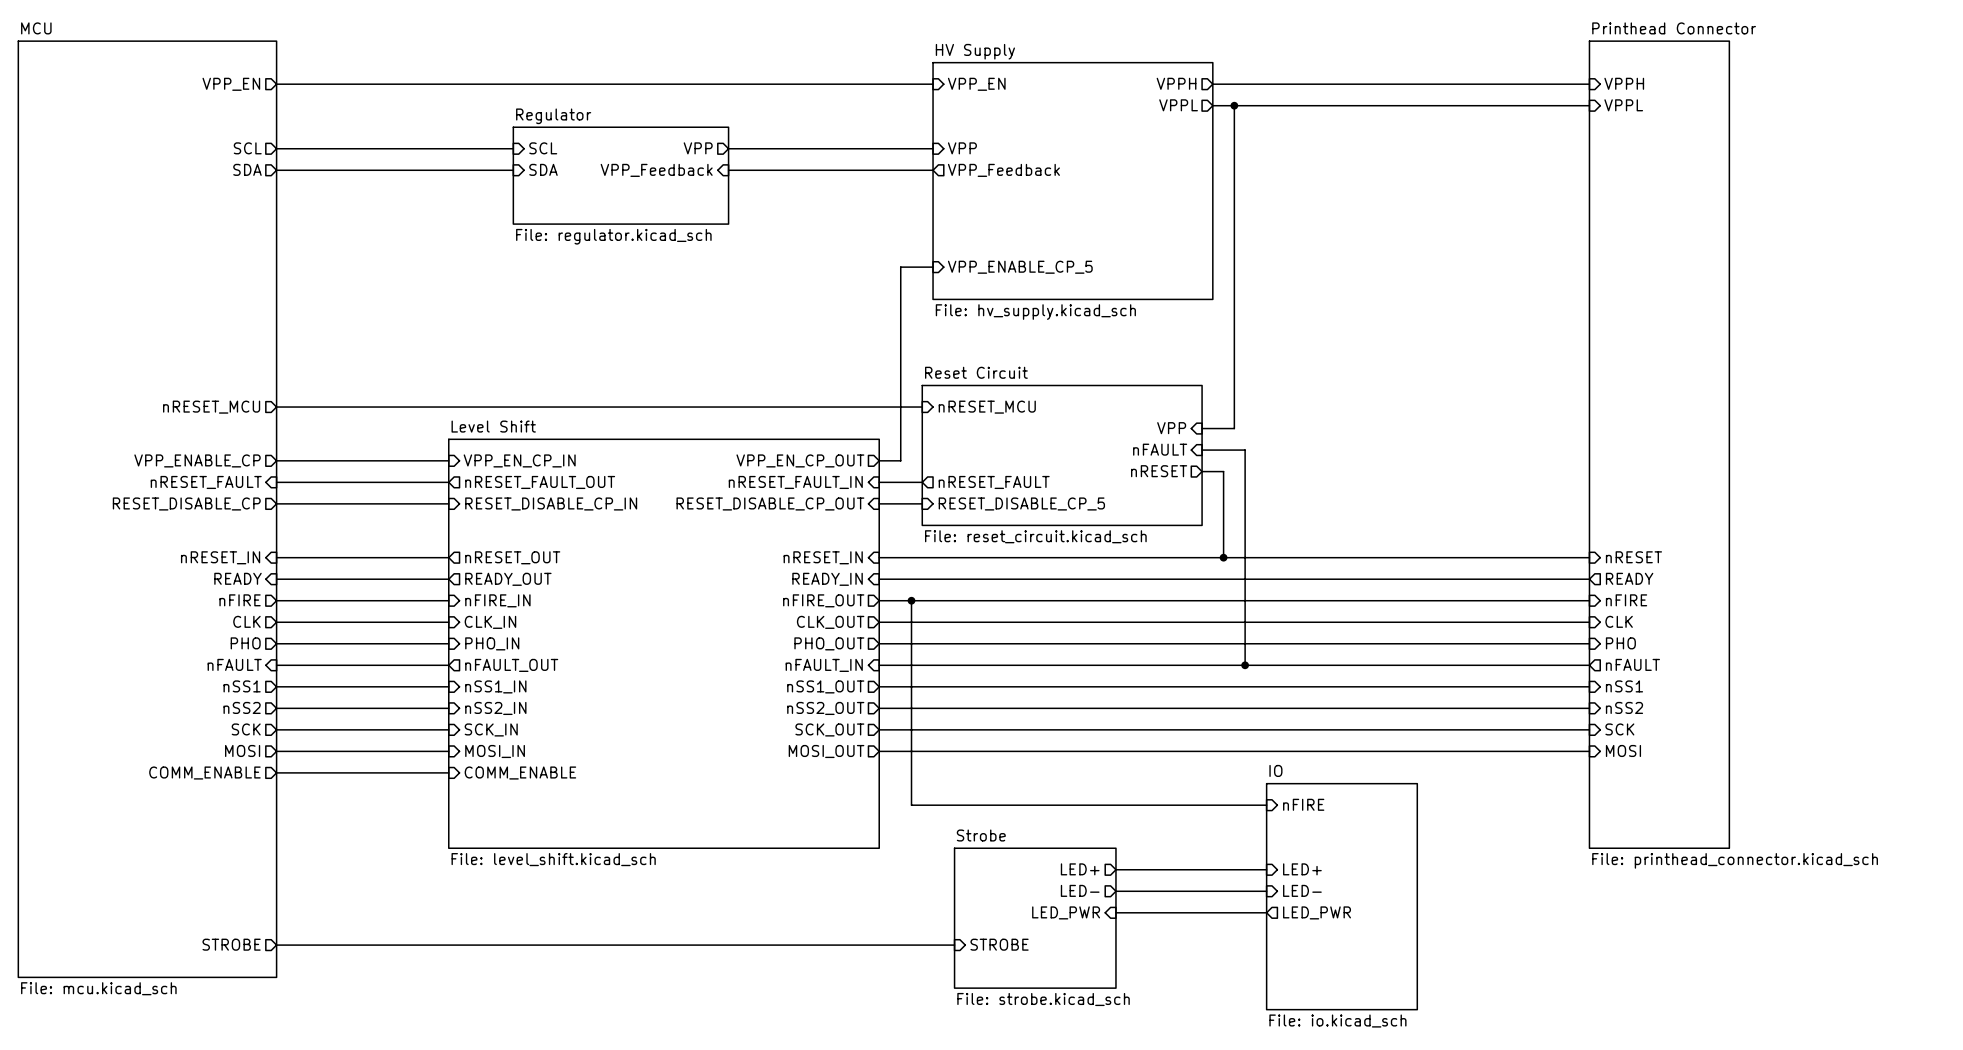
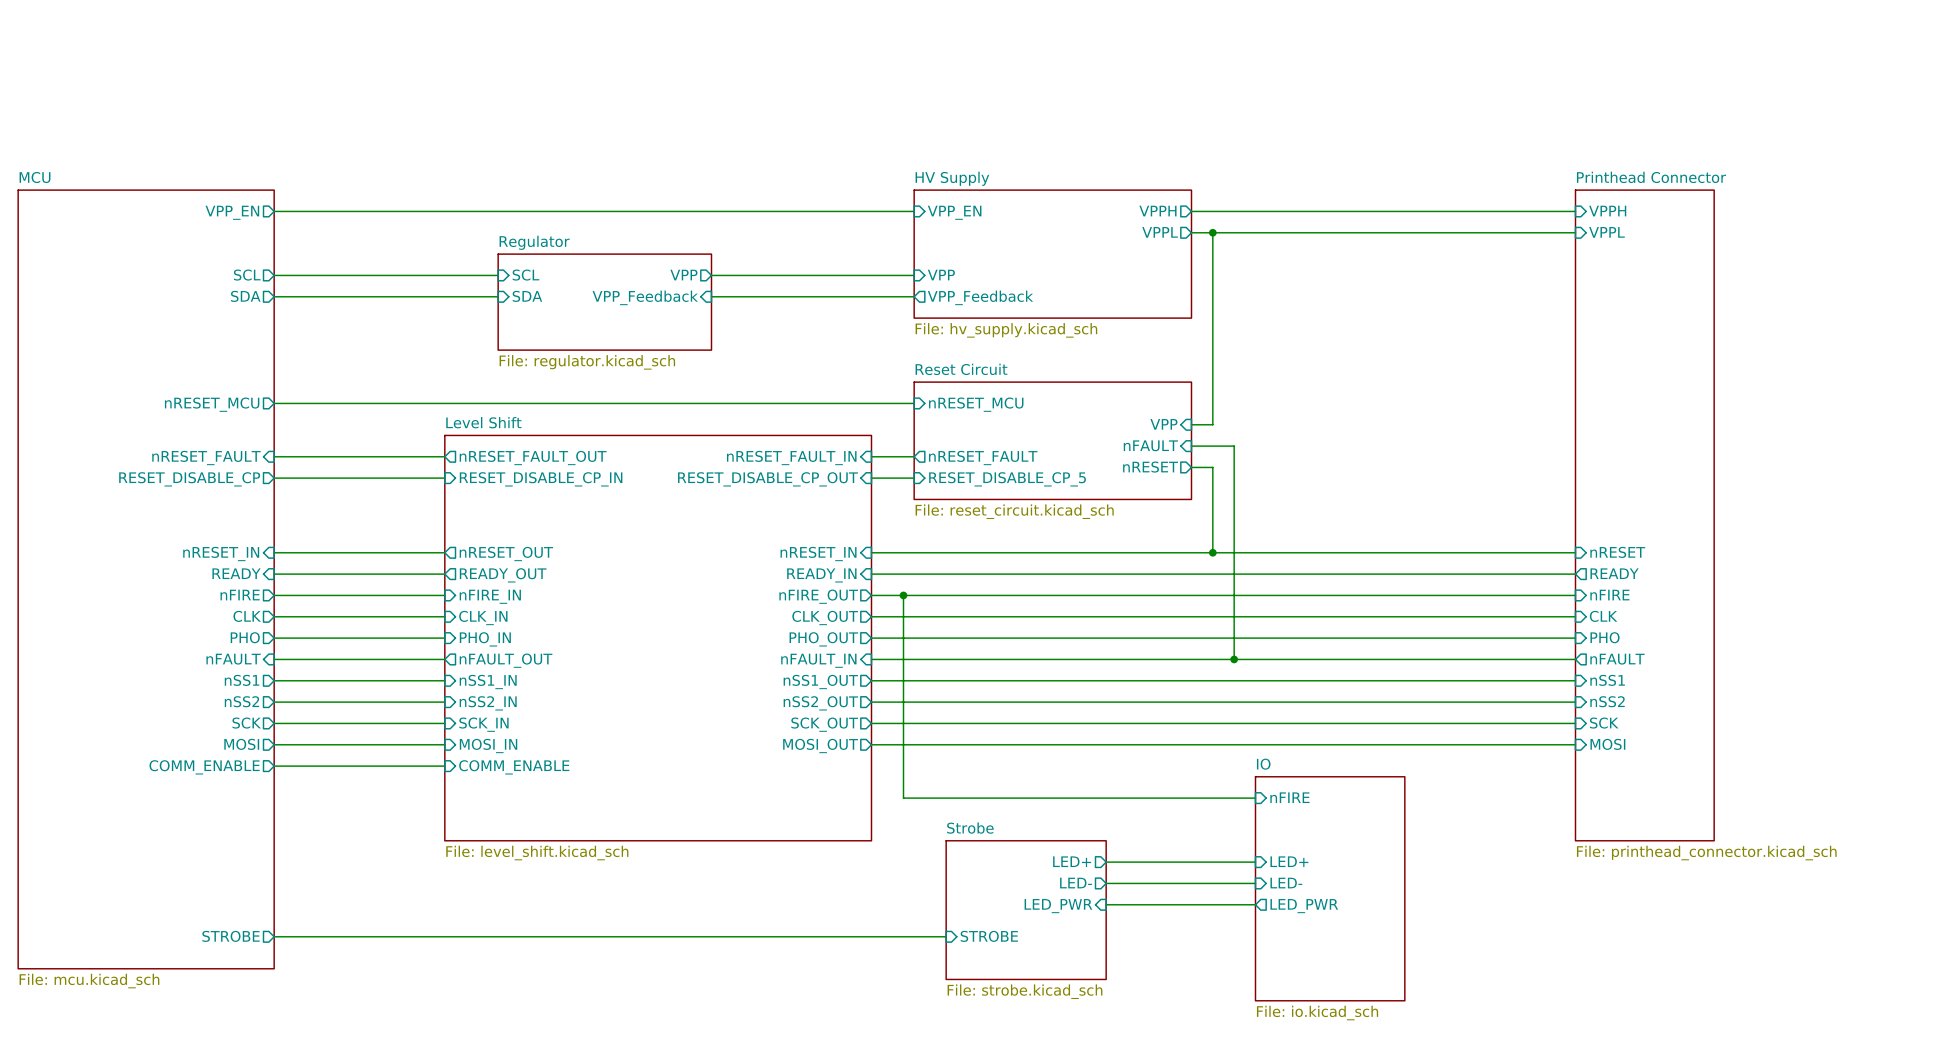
sheet pin position: VPPH (1176, 83) -> VPPH (1157, 211)
sheet pin position: VPPH (1624, 83) -> VPPH (1607, 211)
sheet pin position: VPP_EN (231, 84) -> VPP_EN (232, 212)
wire: (276, 84) (933, 84) -> none
sheet pin position: VPP_EN (976, 84) -> VPP_EN (954, 212)
wire: (1212, 84) (1589, 84) -> none
sheet pin position: VPPL (1178, 105) -> VPPL (1160, 232)
wire: (1212, 105) (1589, 105) -> none
wire: (1234, 105) (1234, 428) (1223, 428) -> (1212, 232) (1212, 424)
junction: (1234, 105) -> none
sheet pin position: VPPL (1623, 105) -> VPPL (1606, 232)
sheet pin position: SCL (247, 148) -> SCL (247, 275)
wire: (276, 148) (513, 148) -> none
sheet pin position: SCL (543, 148) -> SCL (525, 275)
sheet pin: VPP (698, 148) -> none
wire: (728, 148) (933, 148) -> (711, 275) (914, 275)
sheet pin: VPP (962, 148) -> none
sheet pin position: SDA (247, 169) -> SDA (245, 296)
sheet pin position: SDA (543, 169) -> SDA (527, 296)
wire: (276, 170) (513, 170) -> none
sheet pin: VPP_Feedback (656, 170) -> none
wire: (728, 170) (933, 170) -> (711, 296) (914, 296)
sheet pin: VPP_Feedback (1003, 170) -> none
sheet Regulator position: (620, 175) -> (604, 302)
sheet HV Supply: File: hv_supply.kicad_sch (1072, 181) -> none
wire: none -> (274, 211) (914, 211)
wire: none -> (1191, 211) (1575, 211)
wire: none -> (1191, 232) (1575, 232)
junction: none -> (1212, 232)
sheet HV Supply: none -> File: hv_supply.kicad_sch (1052, 254)
wire: (933, 267) (900, 267) (900, 460) -> (914, 456) (892, 456)
sheet pin: VPP_ENABLE_CP_5 (1020, 267) -> none
wire: none -> (274, 275) (498, 275)
sheet pin: none -> VPP (683, 275)
sheet pin: none -> VPP (941, 275)
wire: none -> (274, 296) (498, 296)
sheet pin: none -> VPP_Feedback (645, 297)
sheet pin: none -> VPP_Feedback (980, 297)
sheet Reset Circuit: none -> File: reset_circuit.kicad_sch (1052, 440)
sheet Printhead Connector: File: printhead_connector.kicad_sch (1659, 444) -> none
sheet Reset Circuit: File: reset_circuit.kicad_sch (1062, 455) -> none
sheet pin shape: output (197, 460) -> input (206, 458)
sheet pin: VPP_ENABLE_CP (197, 460) -> nRESET_FAULT (206, 458)
sheet pin shape: input (519, 460) -> output (533, 458)
sheet pin: VPP_EN_CP_IN (519, 460) -> nRESET_FAULT_OUT (533, 458)
sheet pin shape: output (800, 460) -> input (791, 458)
sheet pin: VPP_EN_CP_OUT (800, 460) -> nRESET_FAULT_IN (791, 458)
sheet pin: none -> nRESET_FAULT (983, 458)
sheet pin shape: input (206, 482) -> output (189, 479)
sheet pin: nRESET_FAULT (206, 482) -> RESET_DISABLE_CP (189, 479)
sheet pin shape: output (540, 482) -> input (541, 479)
sheet pin: nRESET_FAULT_OUT (540, 482) -> RESET_DISABLE_CP_IN (541, 479)
sheet pin: nRESET_FAULT_IN (795, 482) -> RESET_DISABLE_CP_OUT (768, 479)
sheet pin shape: output (994, 482) -> input (1007, 479)
sheet pin: nRESET_FAULT (994, 482) -> RESET_DISABLE_CP_5 (1007, 479)
sheet pin: RESET_DISABLE_CP (186, 503) -> none
wire: (276, 503) (448, 503) -> none
sheet pin: RESET_DISABLE_CP_IN (551, 503) -> none
sheet pin: RESET_DISABLE_CP_OUT (770, 503) -> none
wire: (879, 503) (922, 503) -> none
sheet pin: RESET_DISABLE_CP_5 (1021, 503) -> none
sheet MCU: File: mcu.kicad_sch (147, 509) -> none
sheet Printhead Connector: none -> File: printhead_connector.kicad_sch (1644, 515)
sheet MCU: none -> File: mcu.kicad_sch (146, 579)

